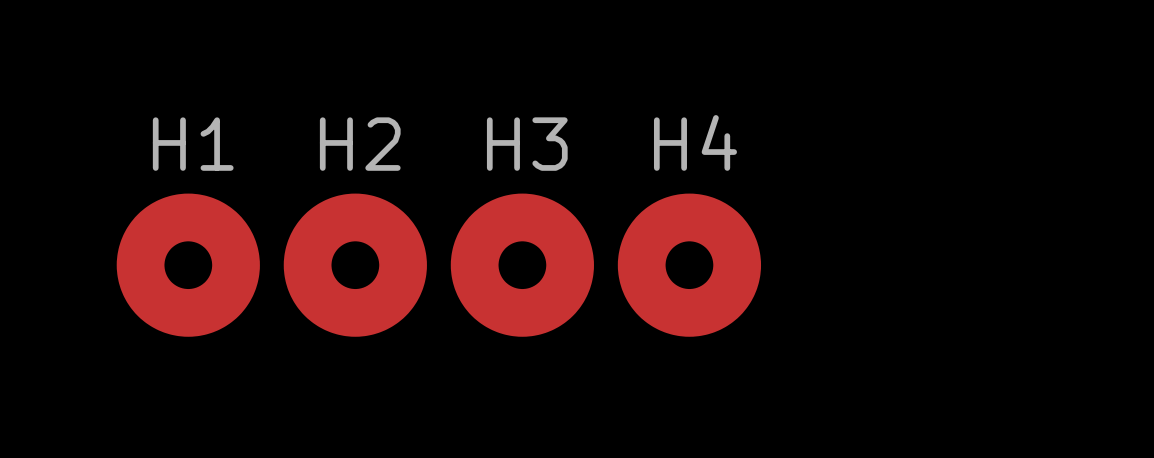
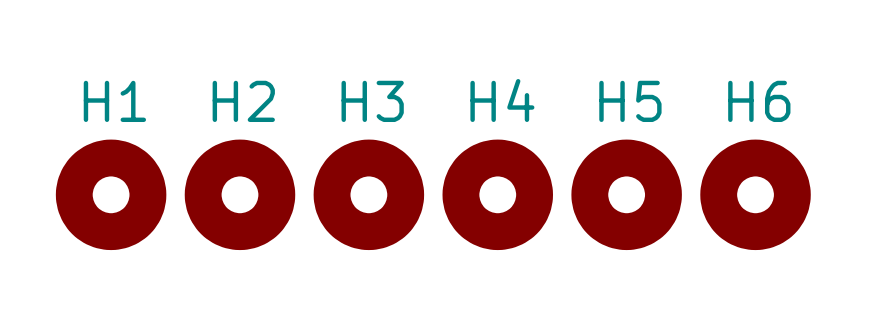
H5: none -> (626, 194)
H6: none -> (755, 194)

